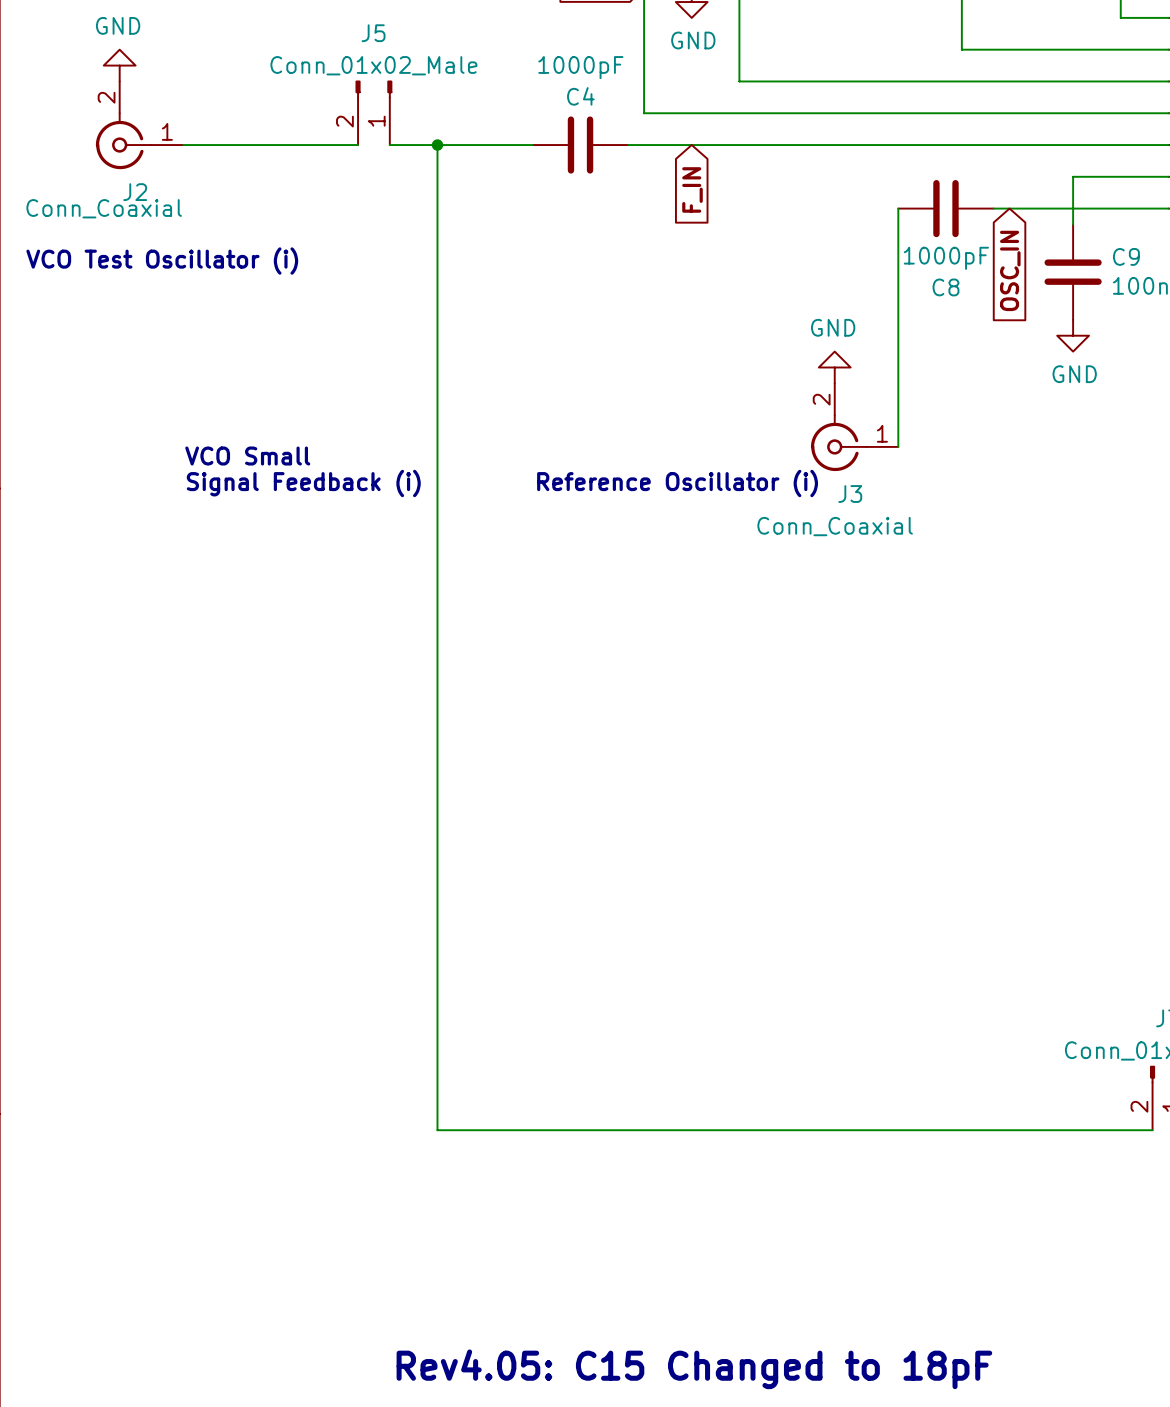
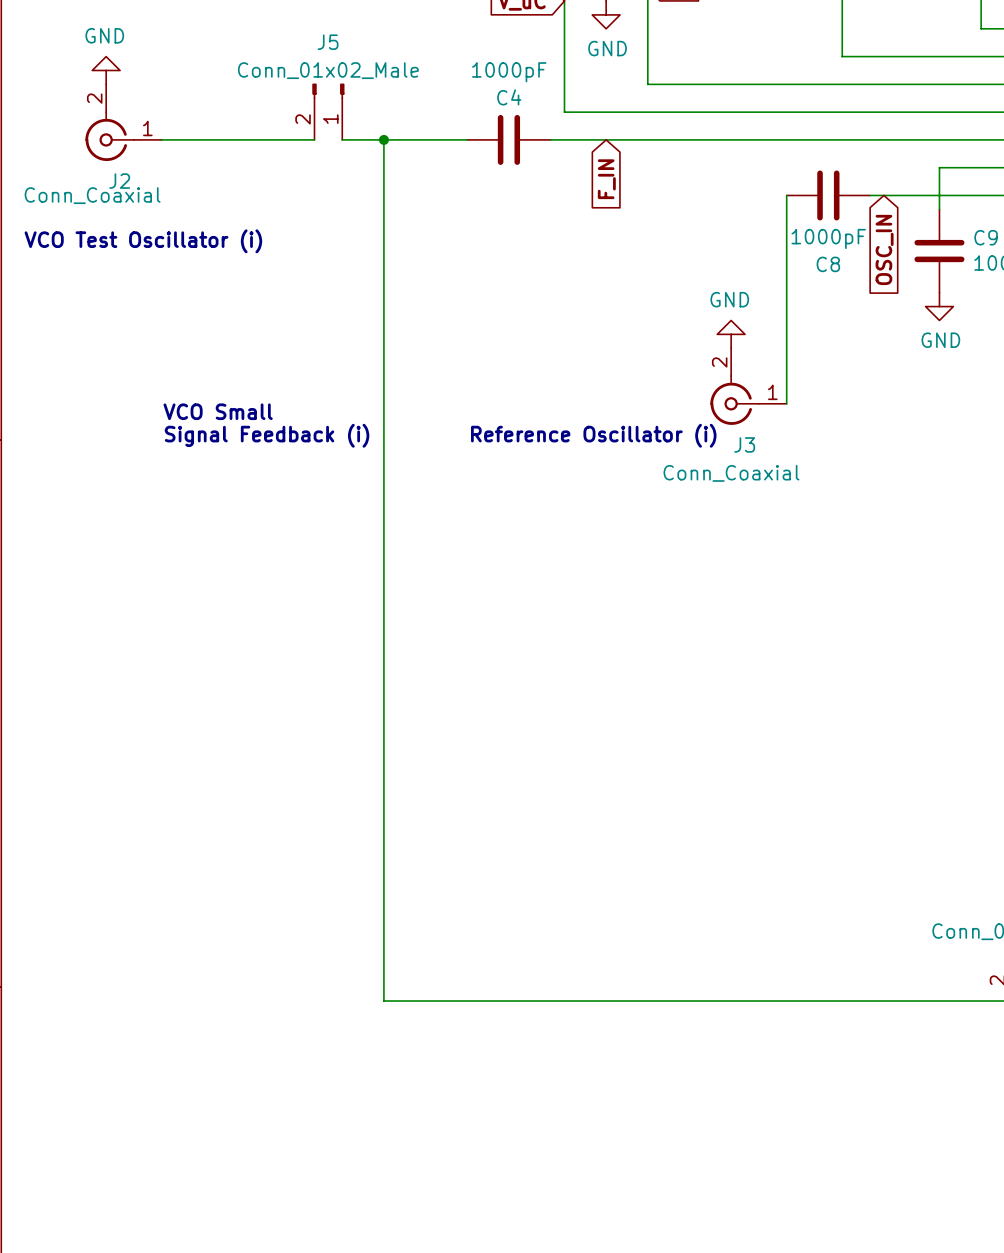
text: Rev4.05: C15 Changed to 18pF (694, 1369) -> none

